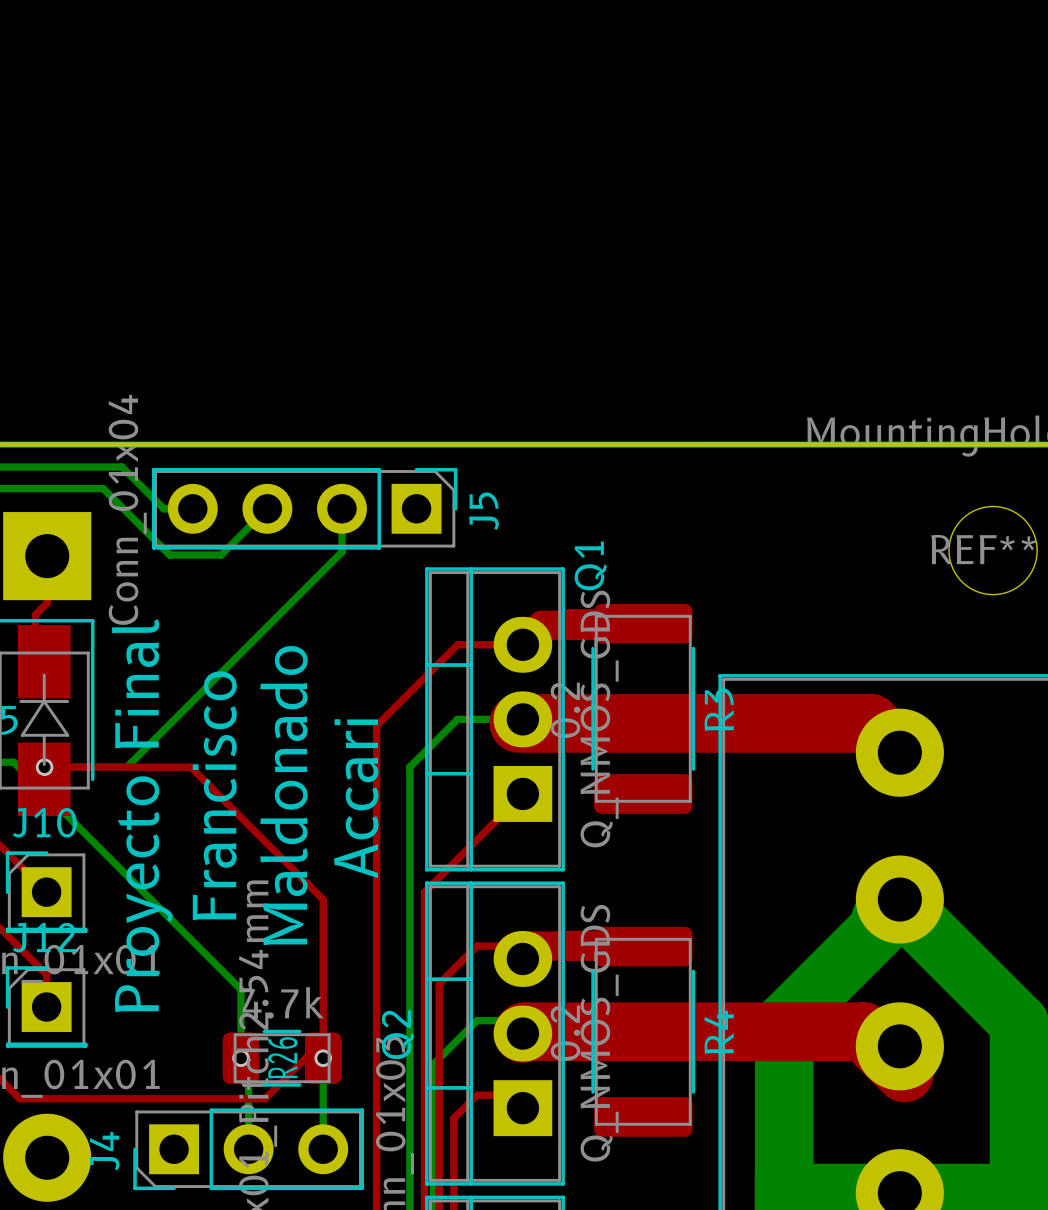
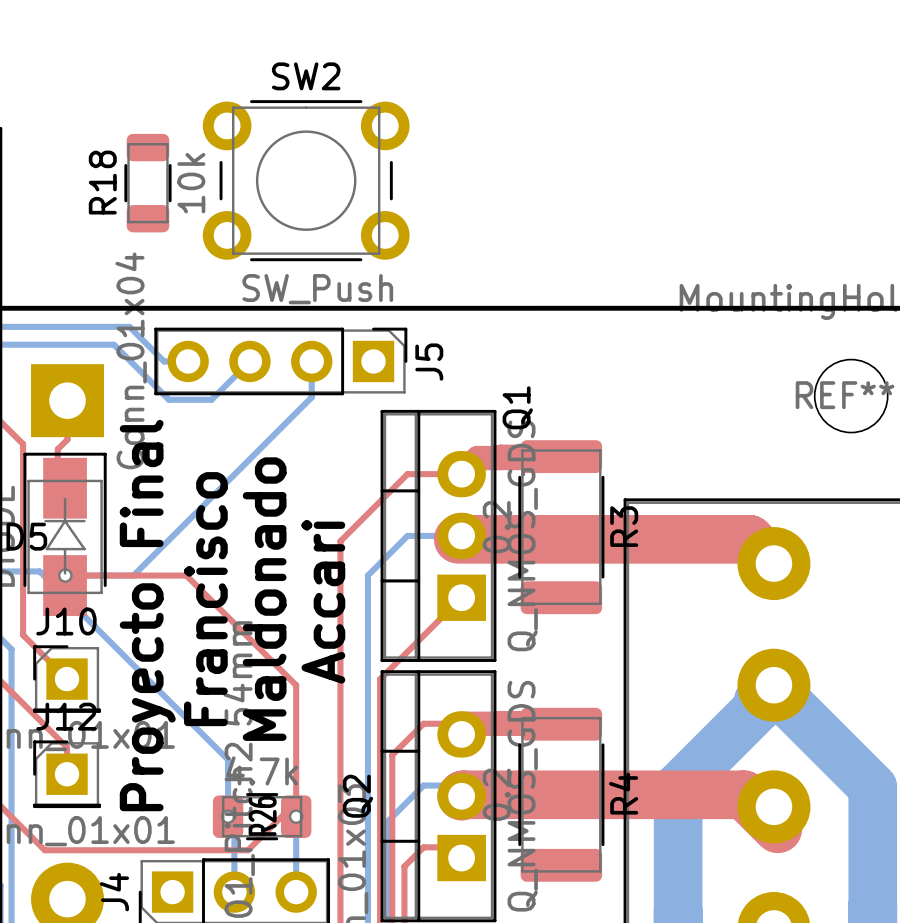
SW2: none -> SW_Push (306, 180)
R18: none -> 10k (147, 183)

